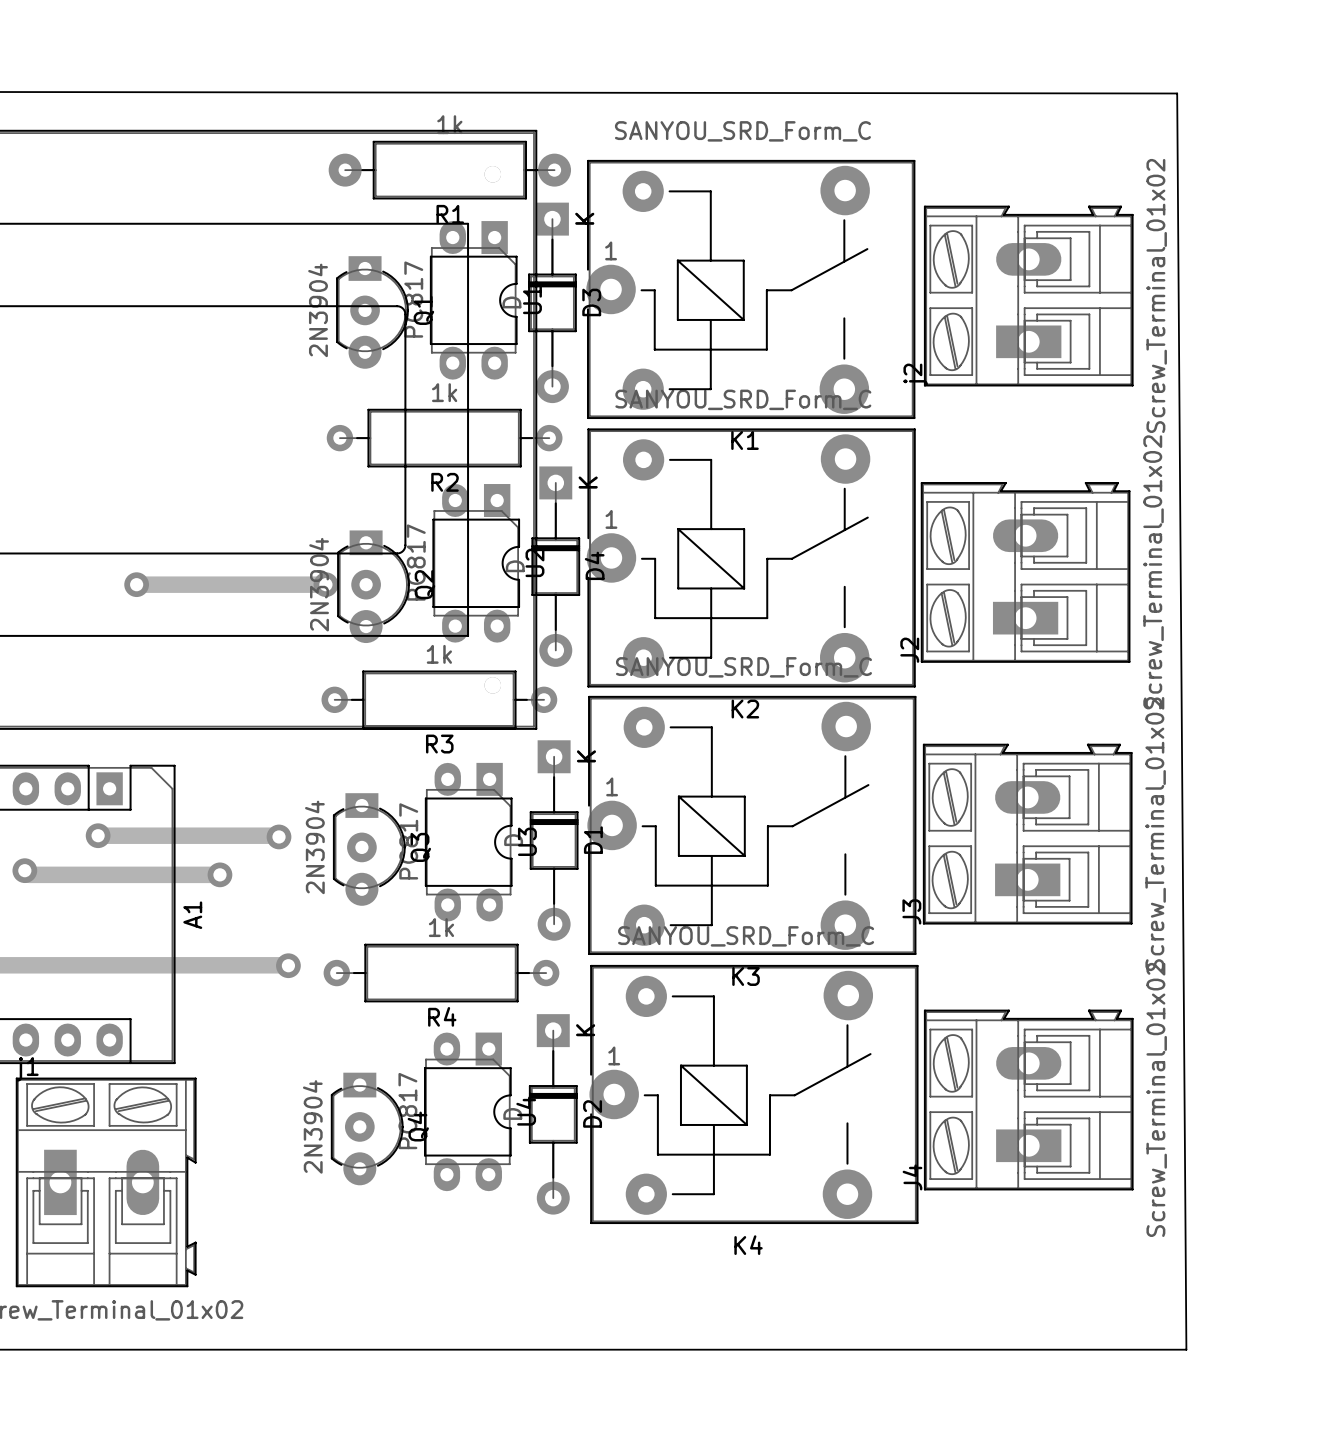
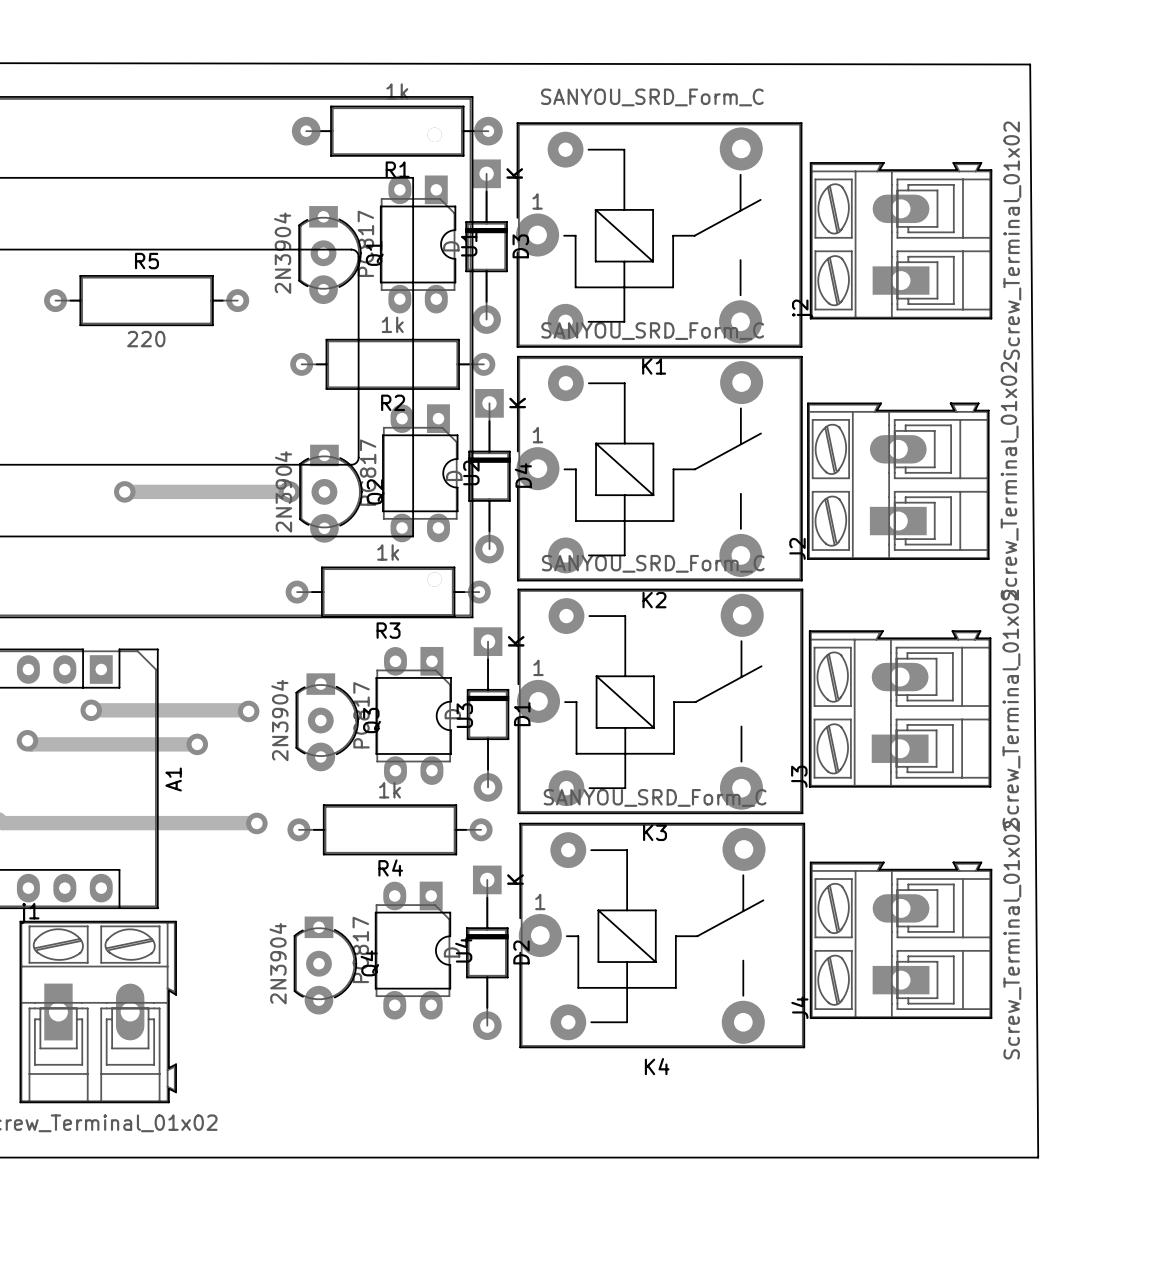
R5: none -> 220 (146, 300)

